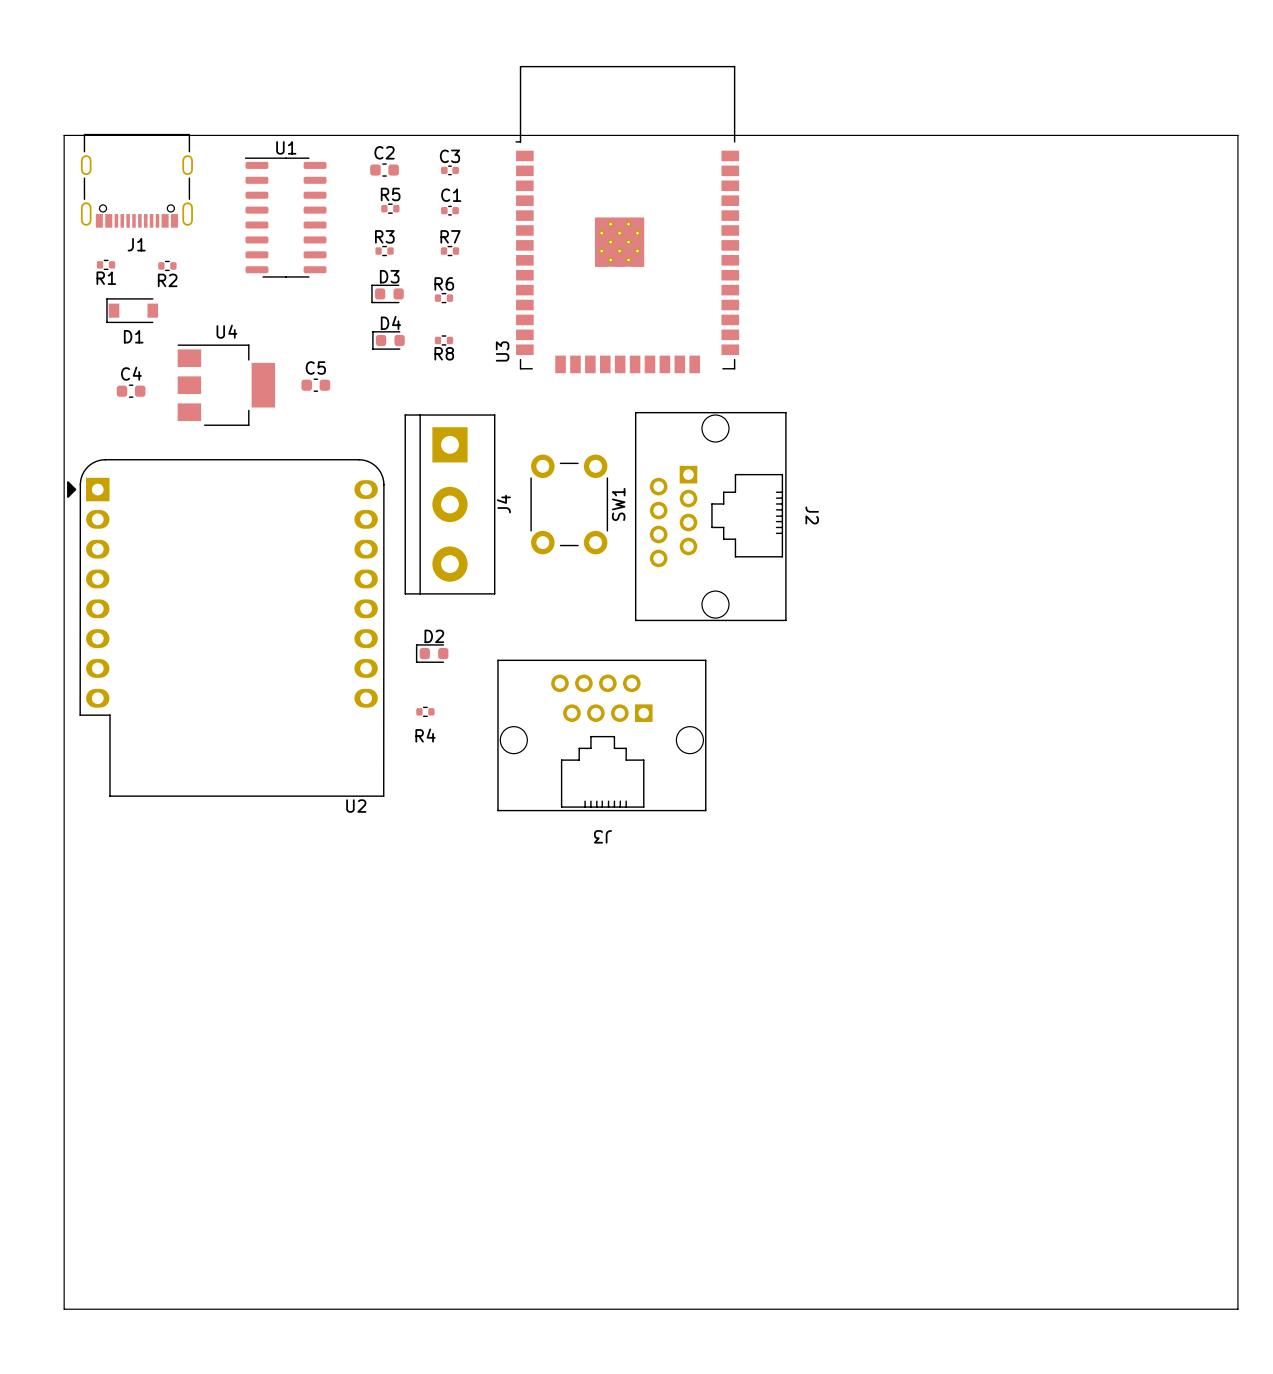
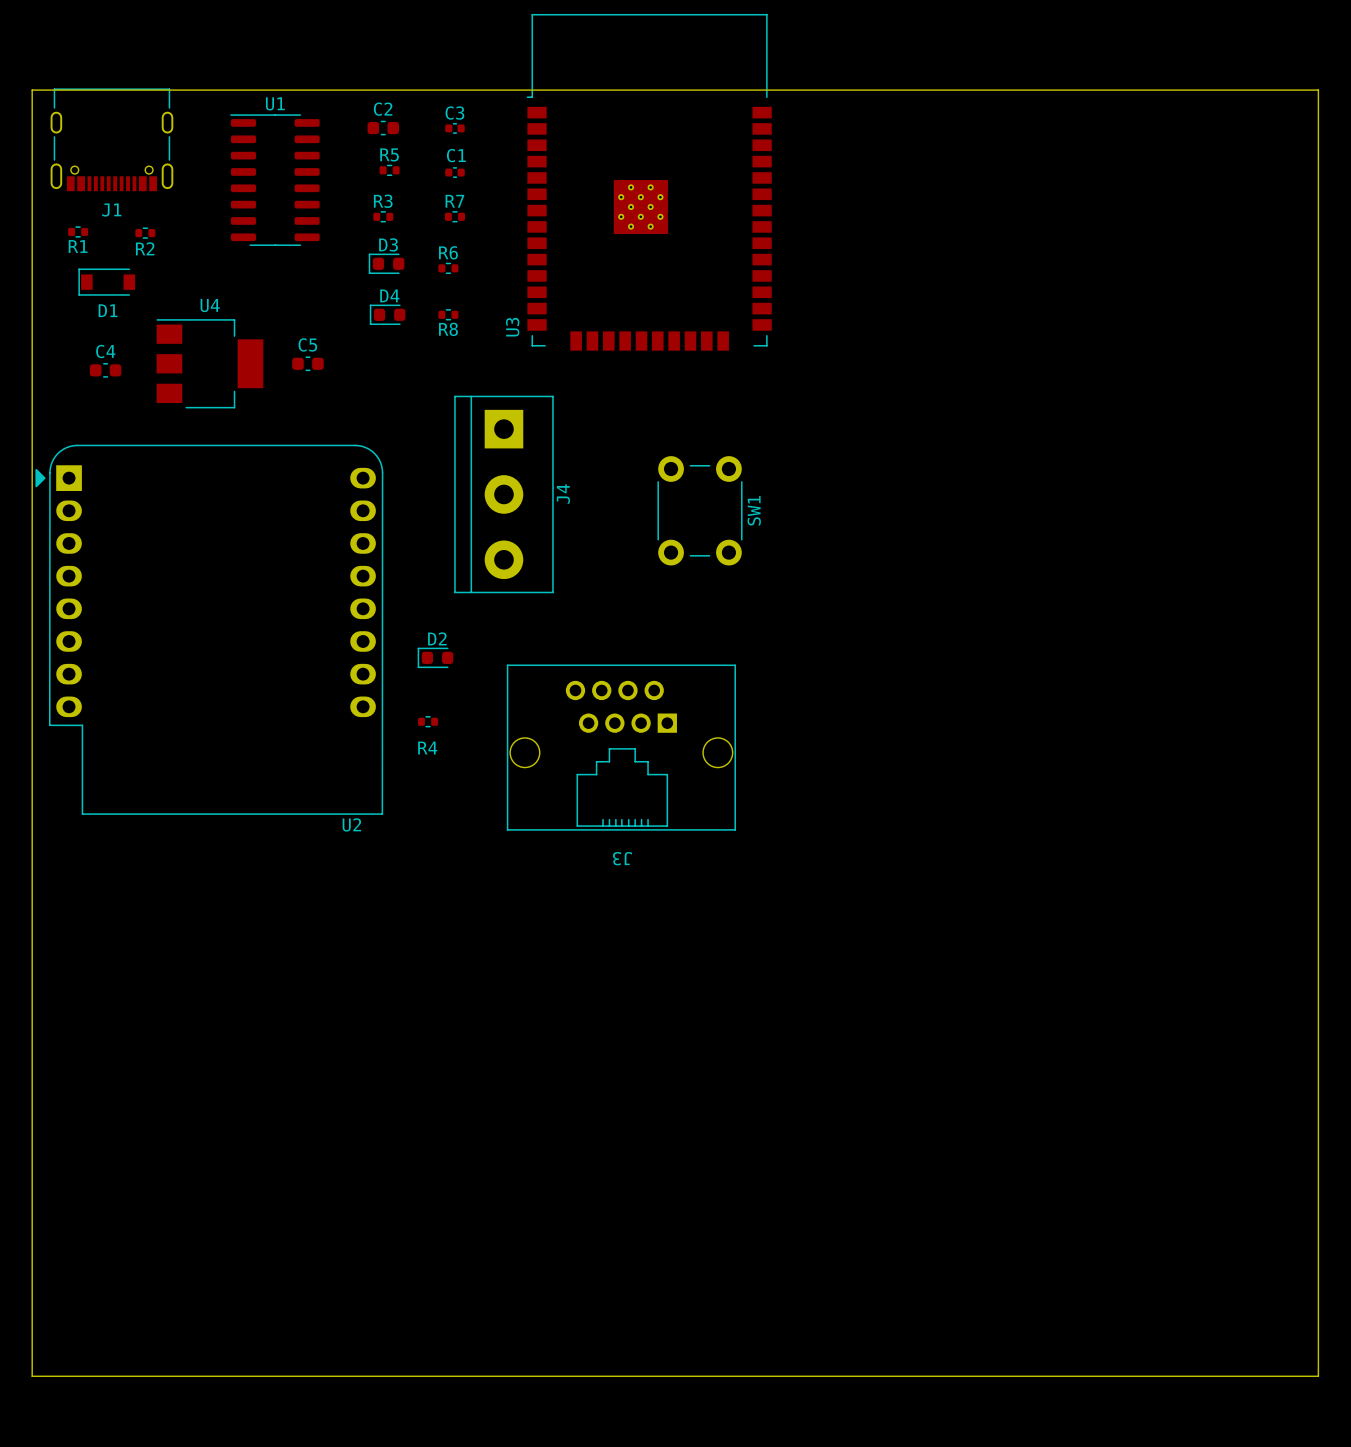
J4 position: (449, 504) -> (503, 494)
SW1 position: (569, 504) -> (699, 510)
J2: (710, 516) -> none

